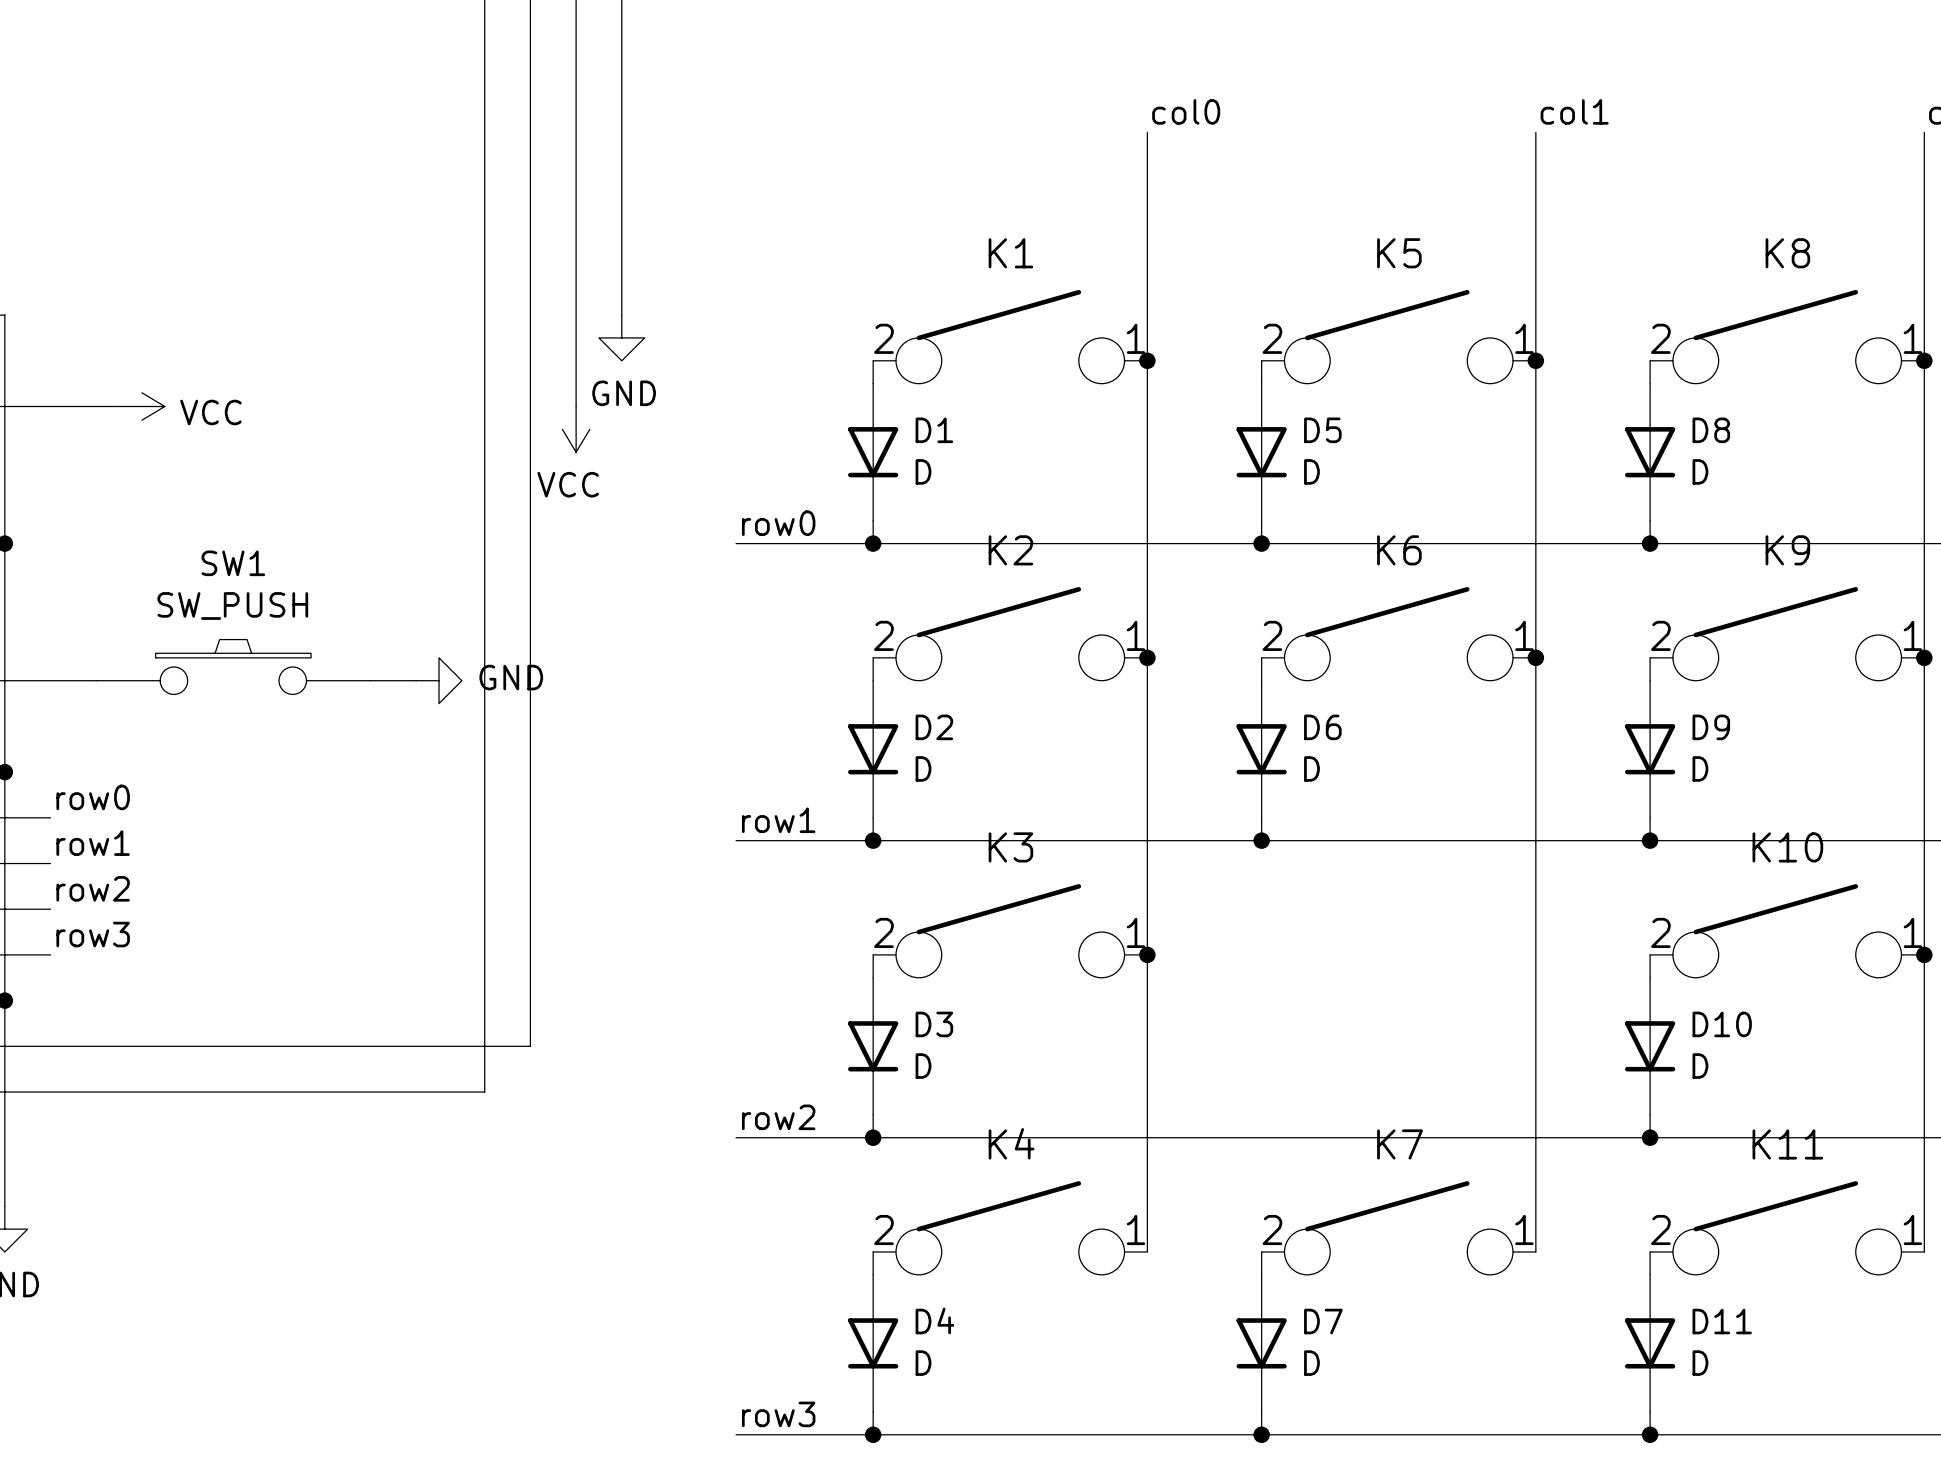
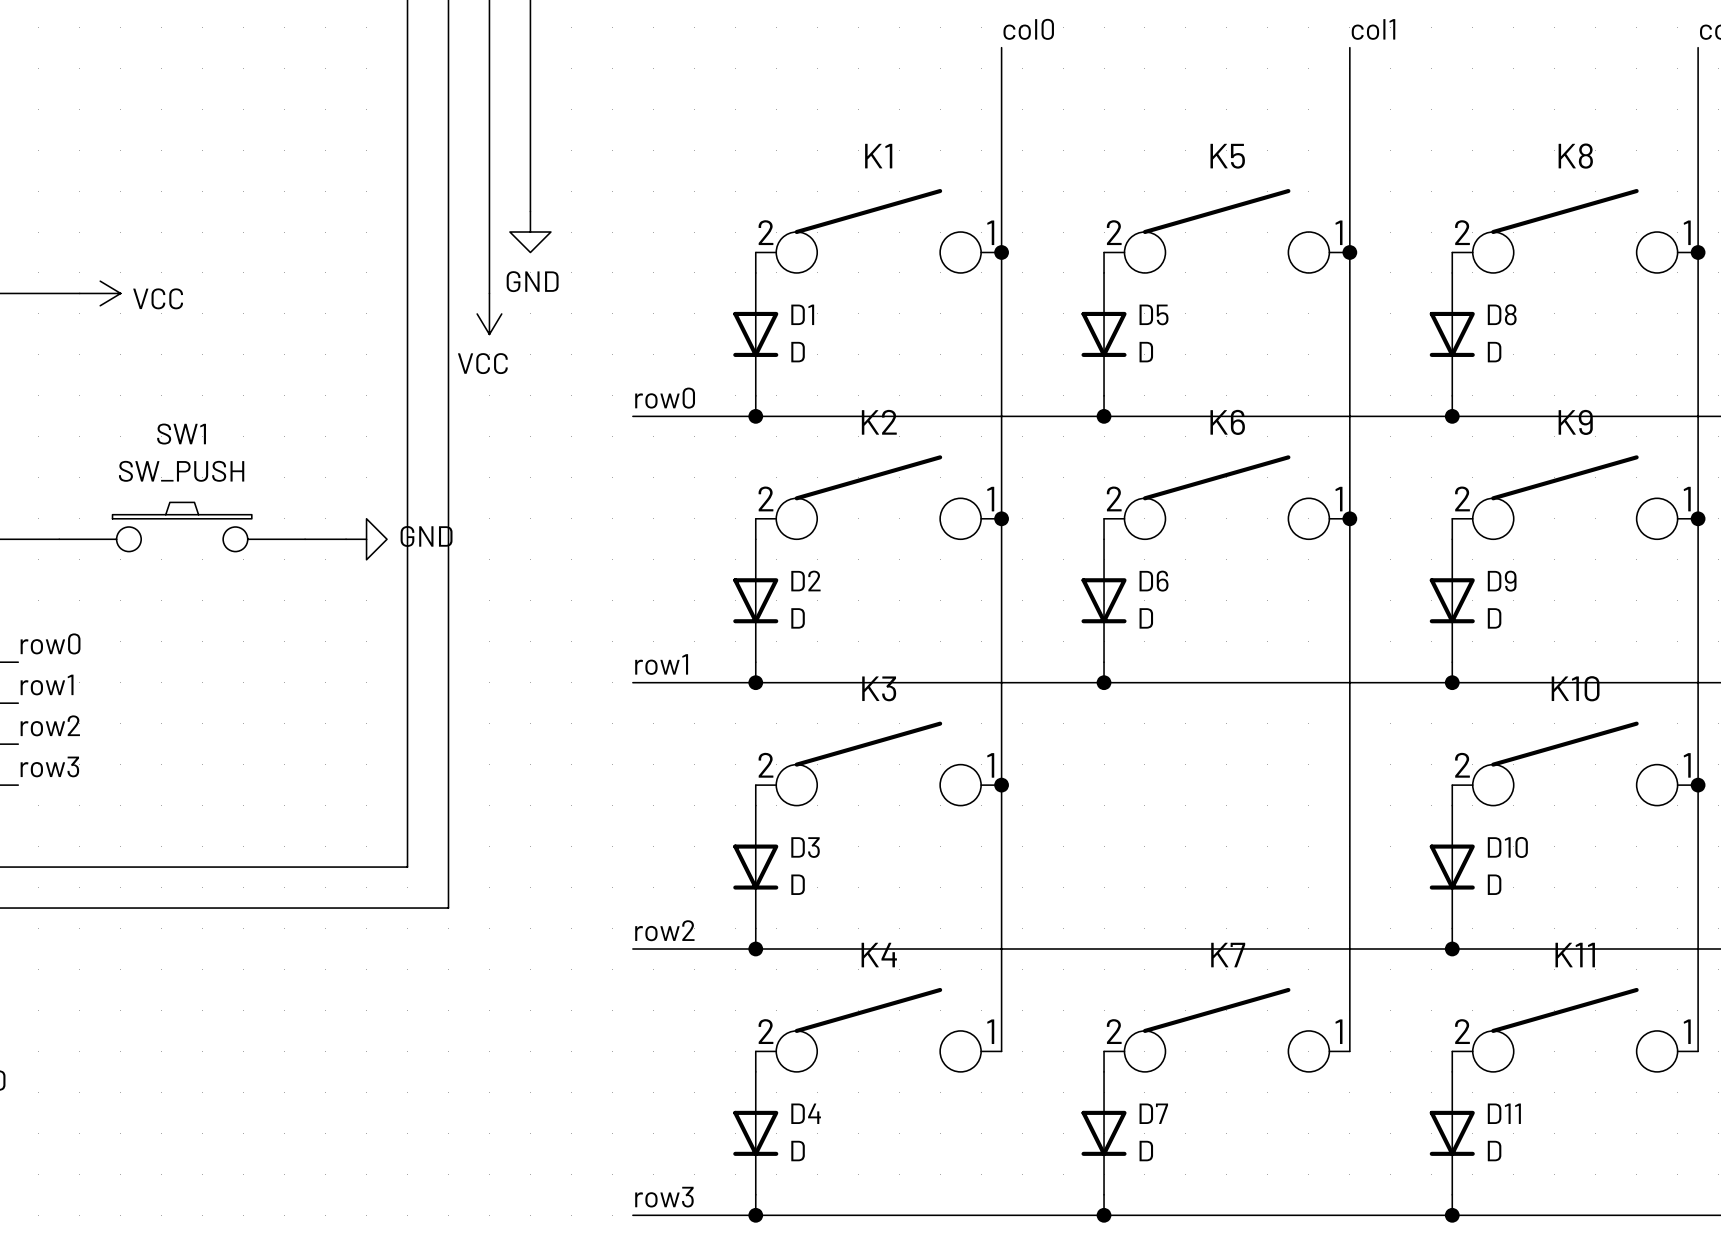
wire: (530, 1046) (484, 1046) (484, 1092) -> (448, 867) (448, 908) (407, 908)

